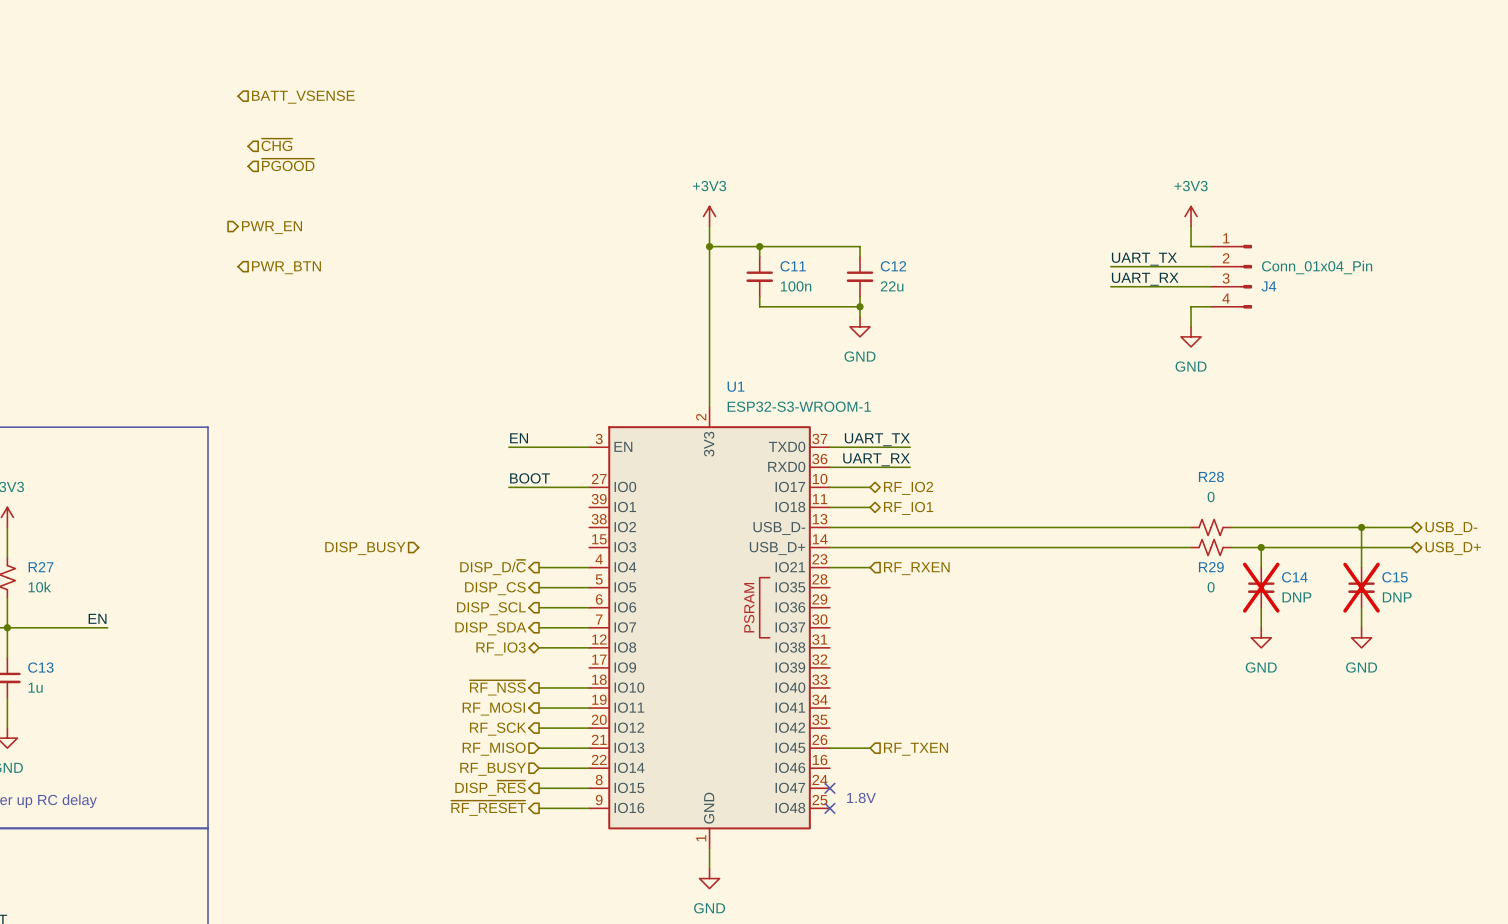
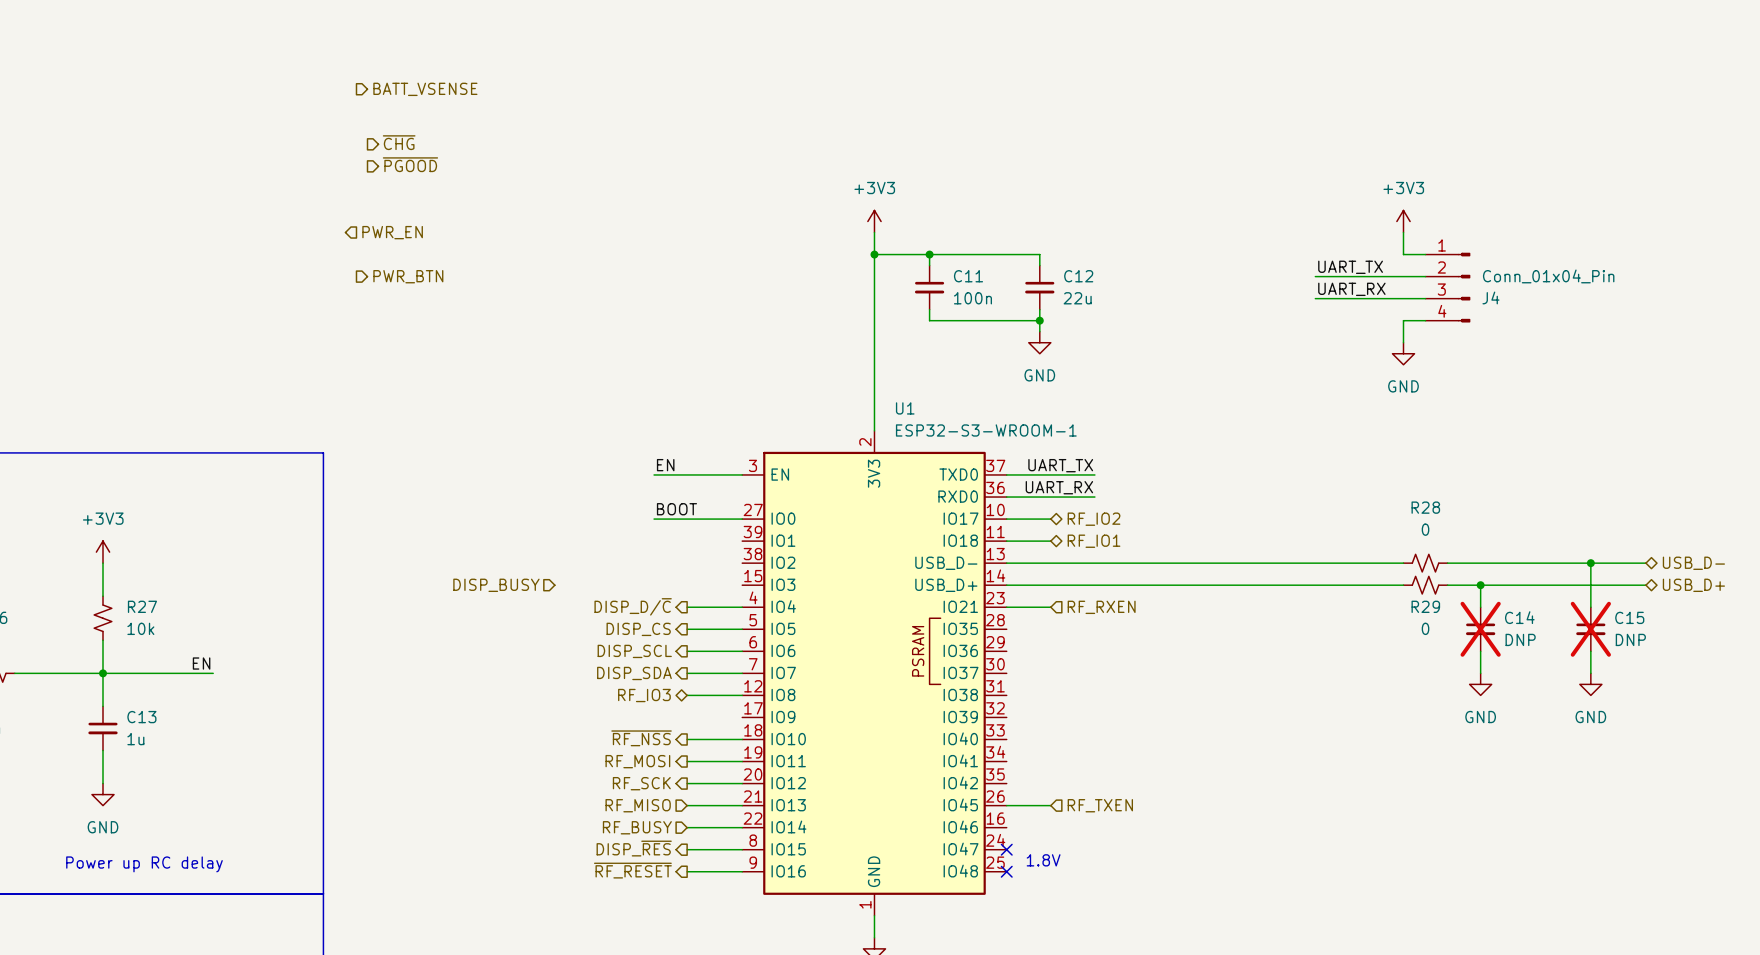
hierarchical label shape: input (303, 97) -> output (425, 89)
hierarchical label shape: input (276, 144) -> output (399, 142)
hierarchical label shape: input (288, 164) -> output (410, 164)
hierarchical label shape: output (271, 227) -> input (392, 232)
hierarchical label shape: input (286, 267) -> output (408, 276)

